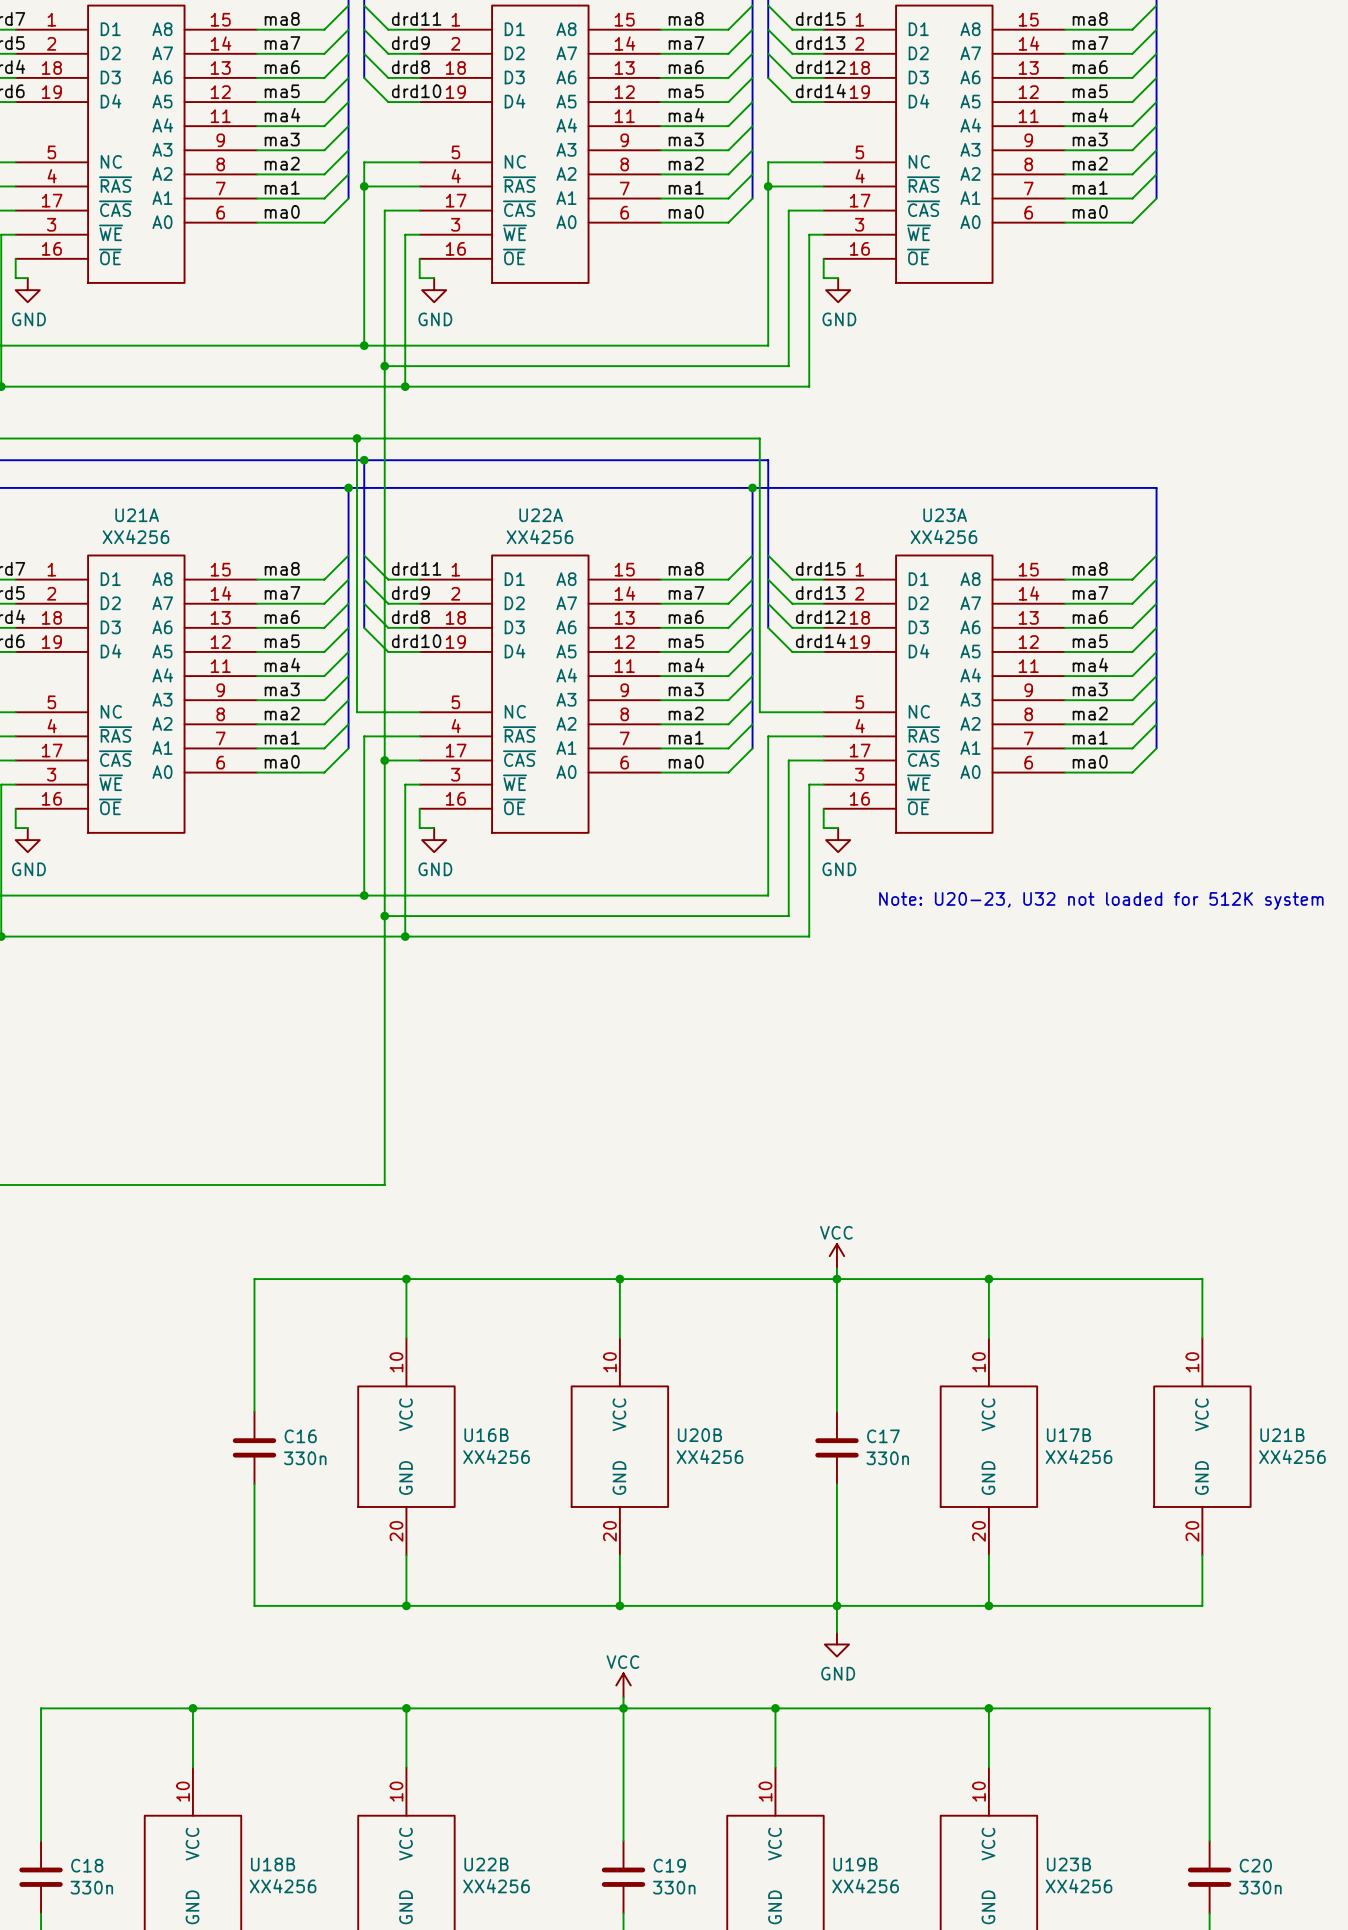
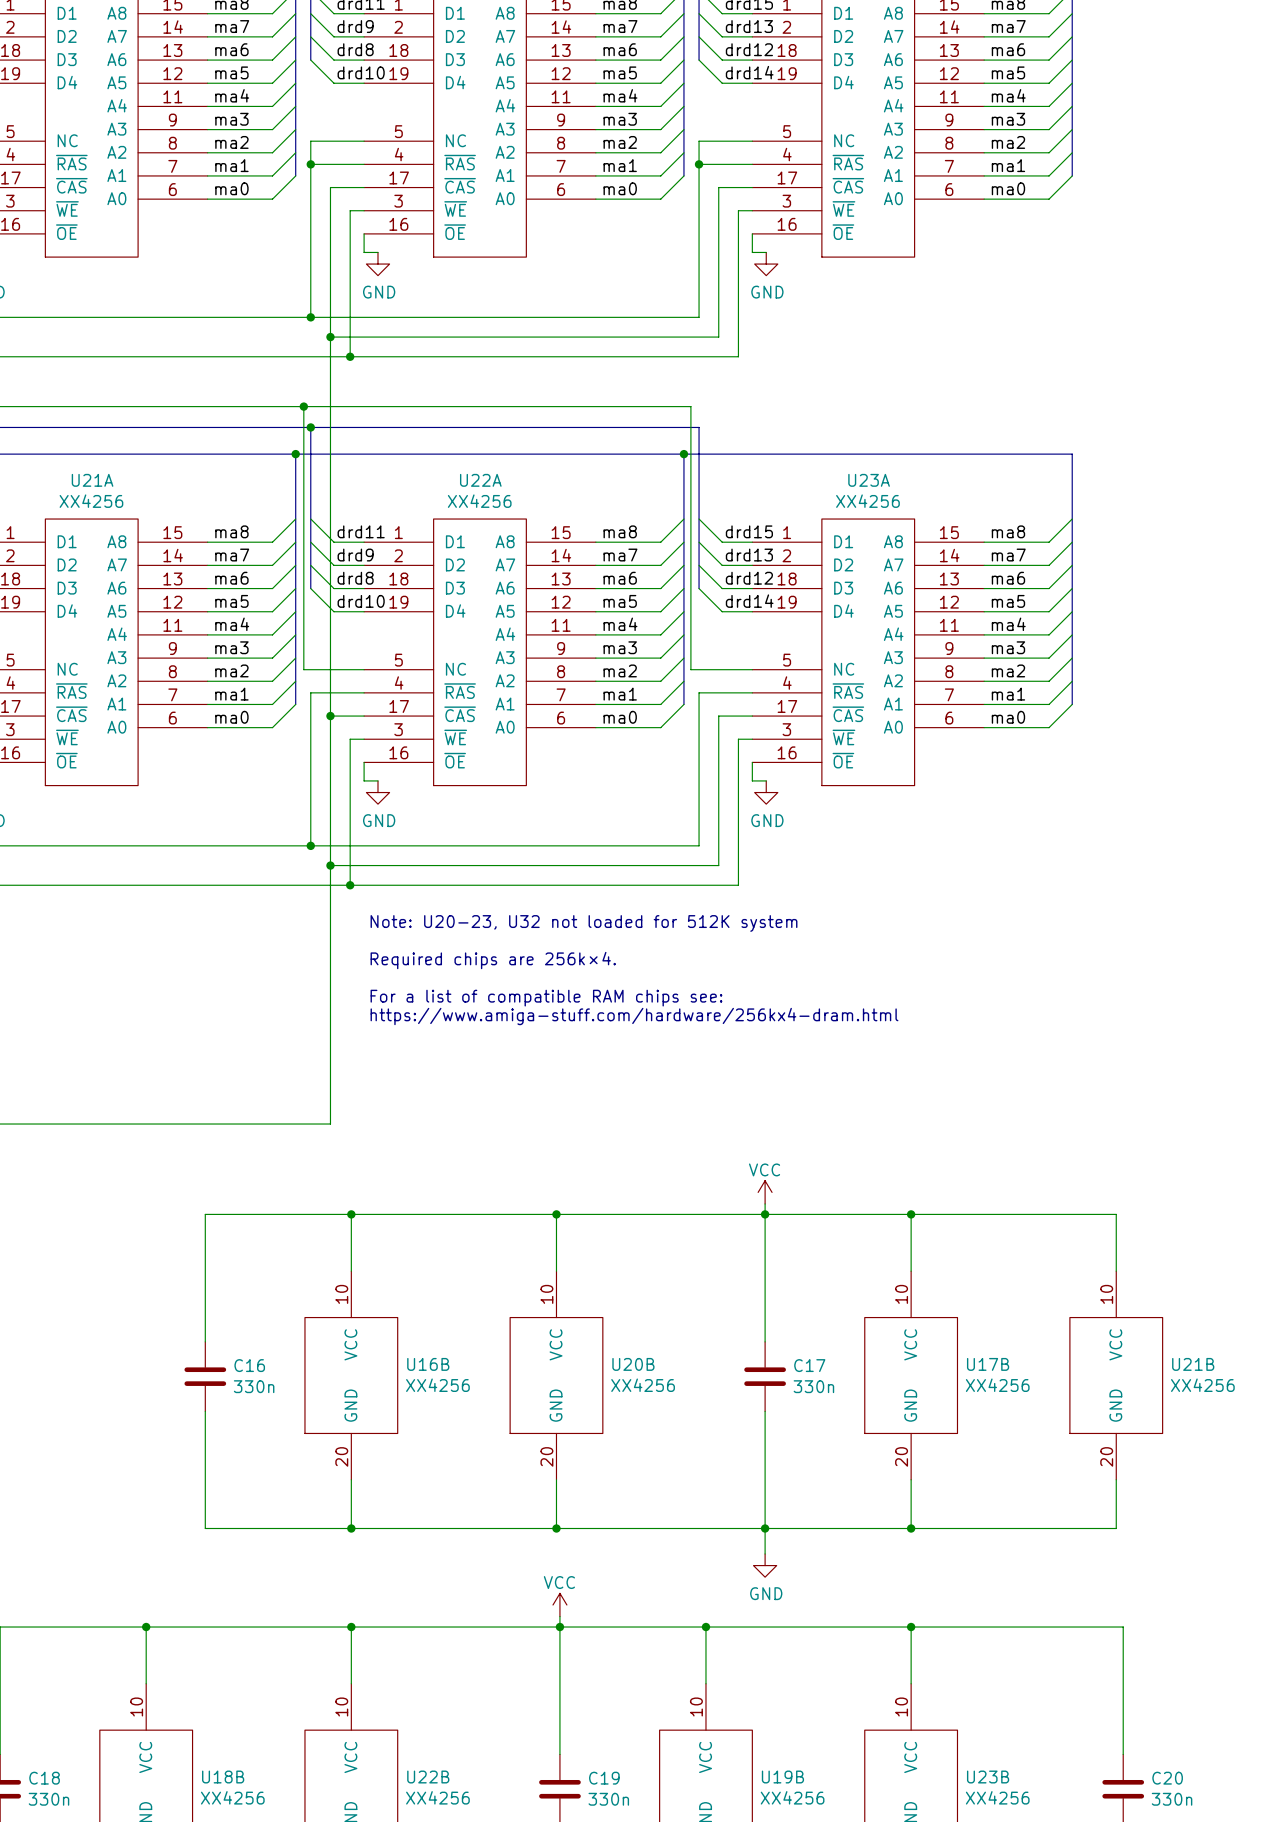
text: Note: U20-23, U32 not loaded for 512K system (1101, 900) -> none
text: none -> Note: U20-23, U32 not loaded for 512K system (583, 923)
text: none -> Required chips are 256k×4. (493, 960)
text: none -> For a list of compatible RAM chips see: (546, 998)
text: none -> https://www.amiga-stuff.com/hardware/256kx4-dram.html (634, 1016)

